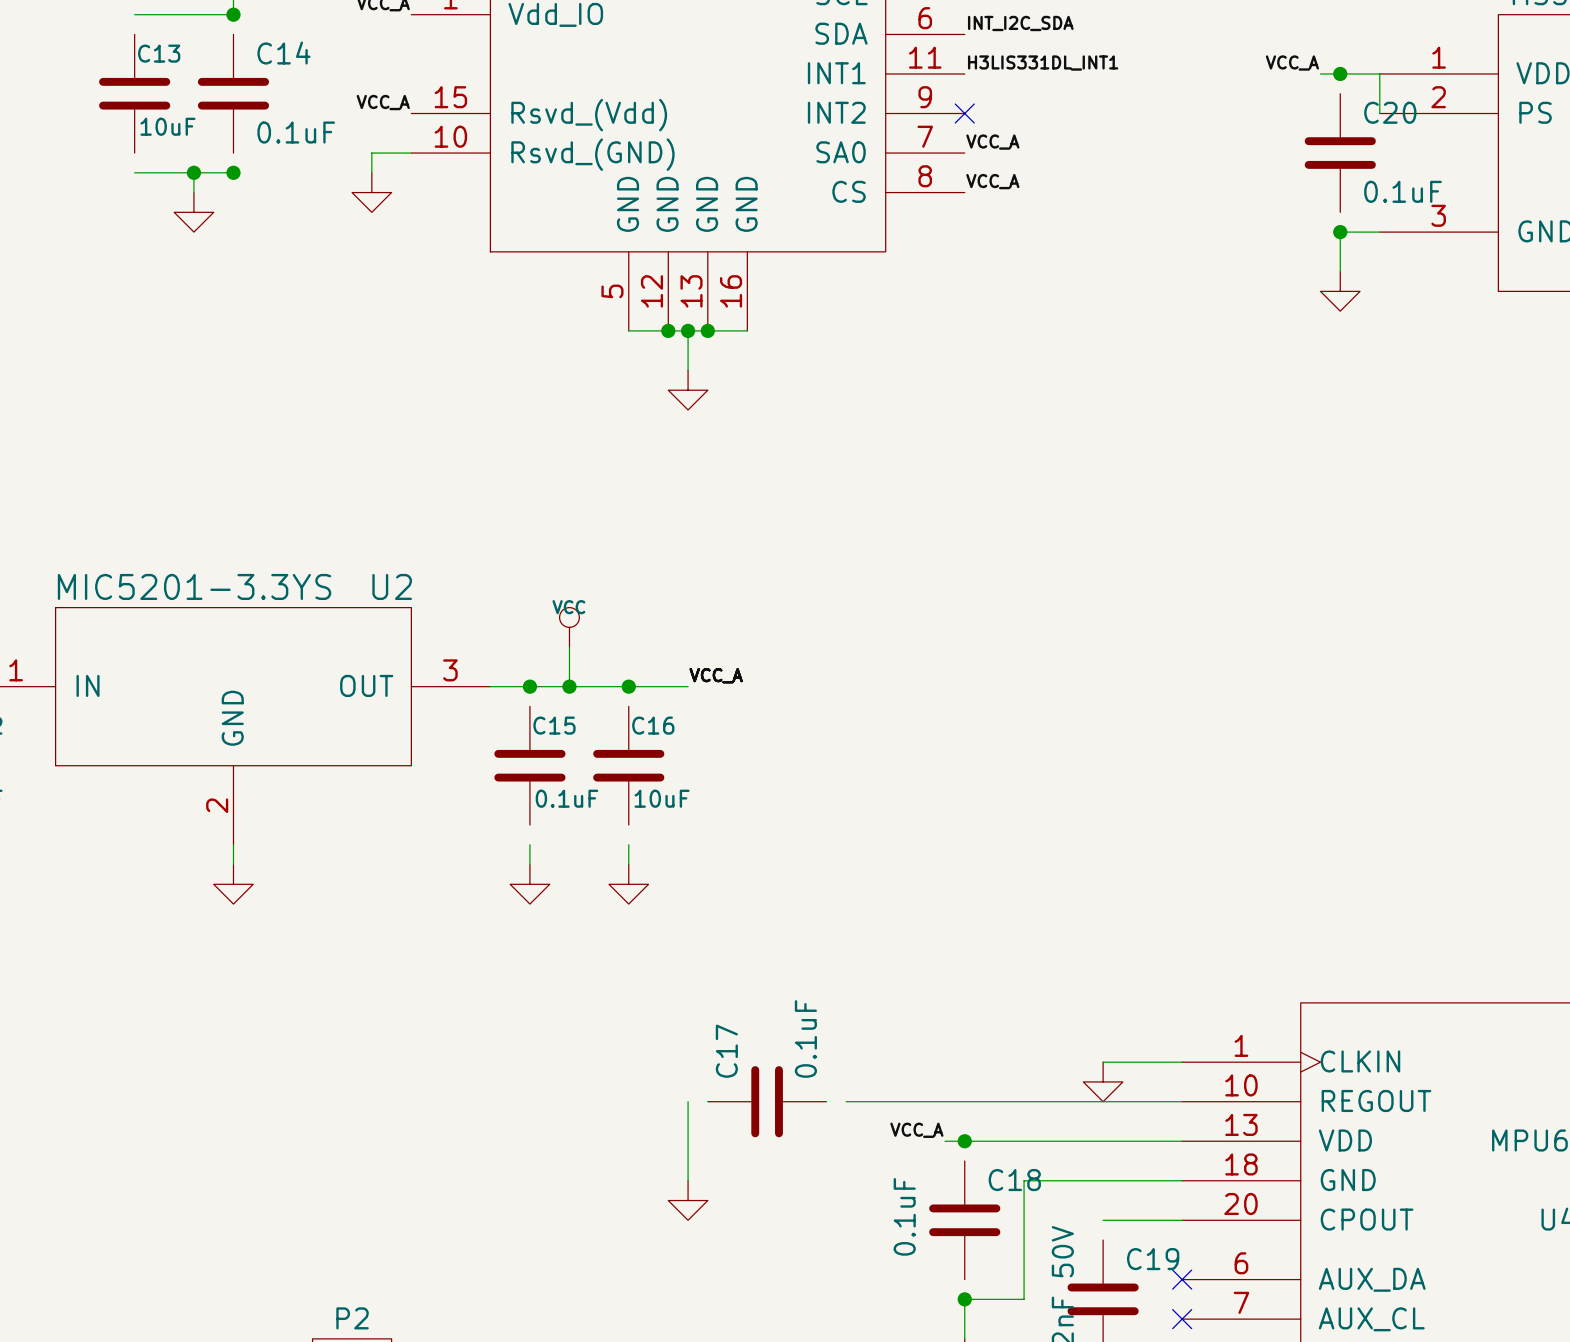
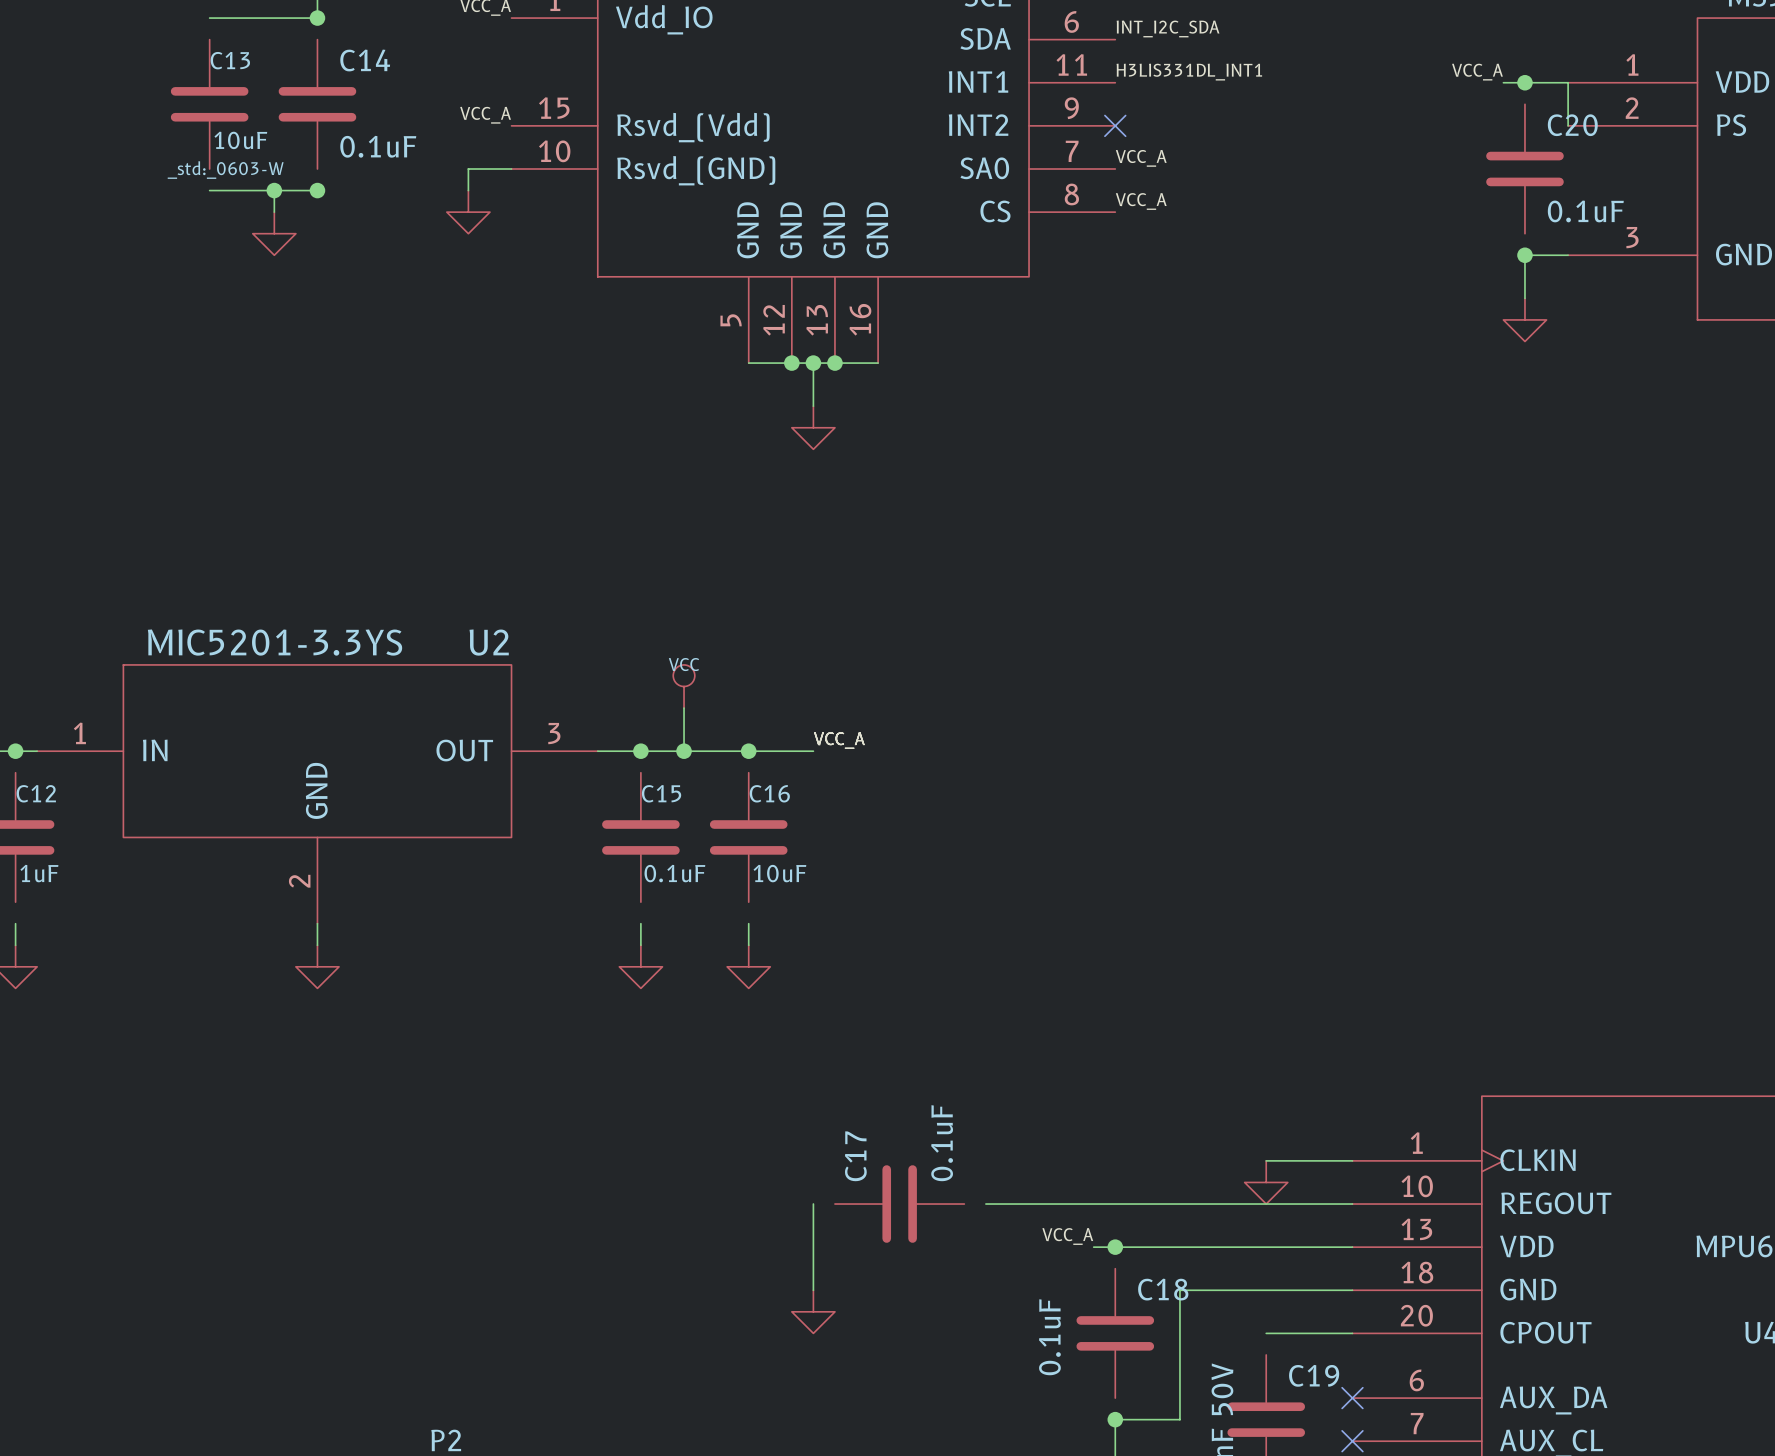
C13 text: none -> _std:_0603-W (225, 170)

